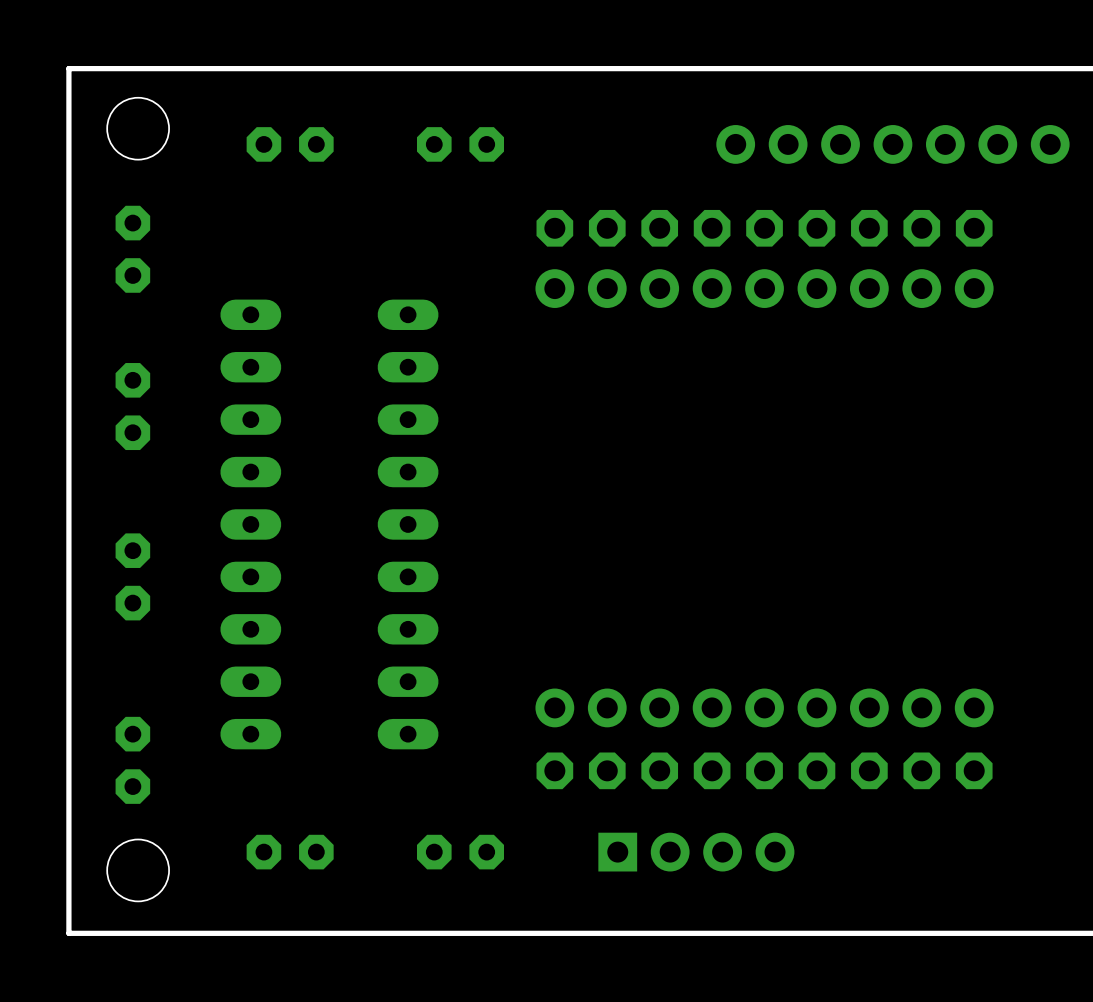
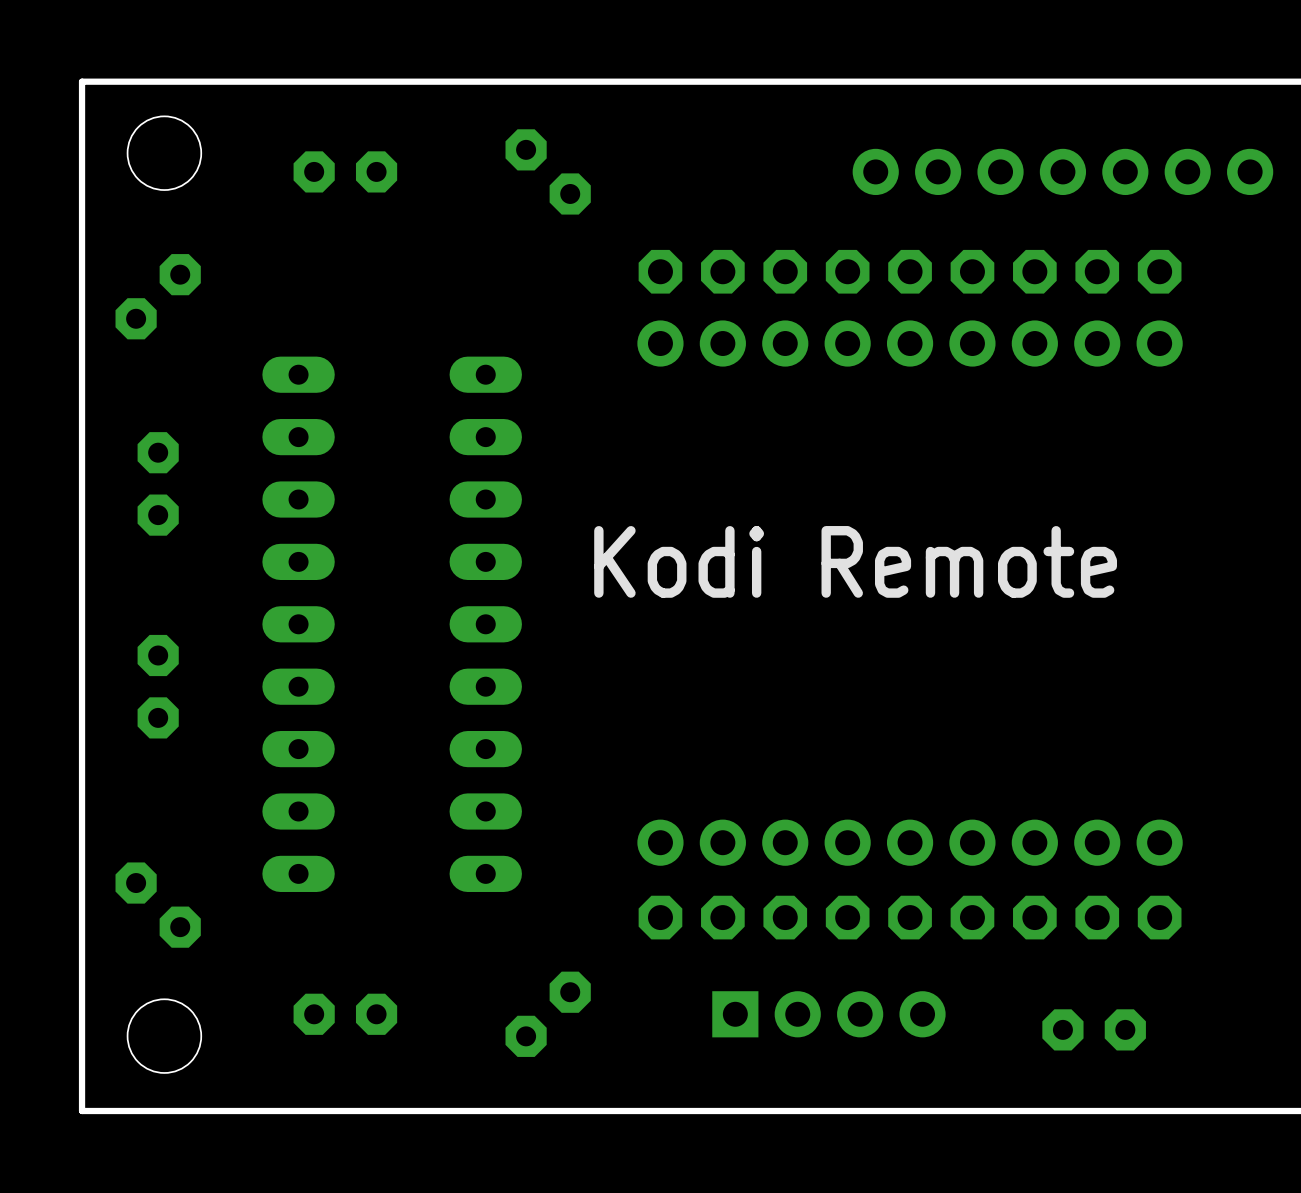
part rotation: 0° (460, 144) -> 45° clockwise (548, 171)
part rotation: 0° (132, 249) -> 45° clockwise (158, 296)
text: none -> Kodi Remote (855, 561)
part rotation: 0° (132, 760) -> 45° counterclockwise (158, 905)
part rotation: 0° (460, 852) -> 45° counterclockwise (548, 1014)
part: none -> (1094, 1029)

